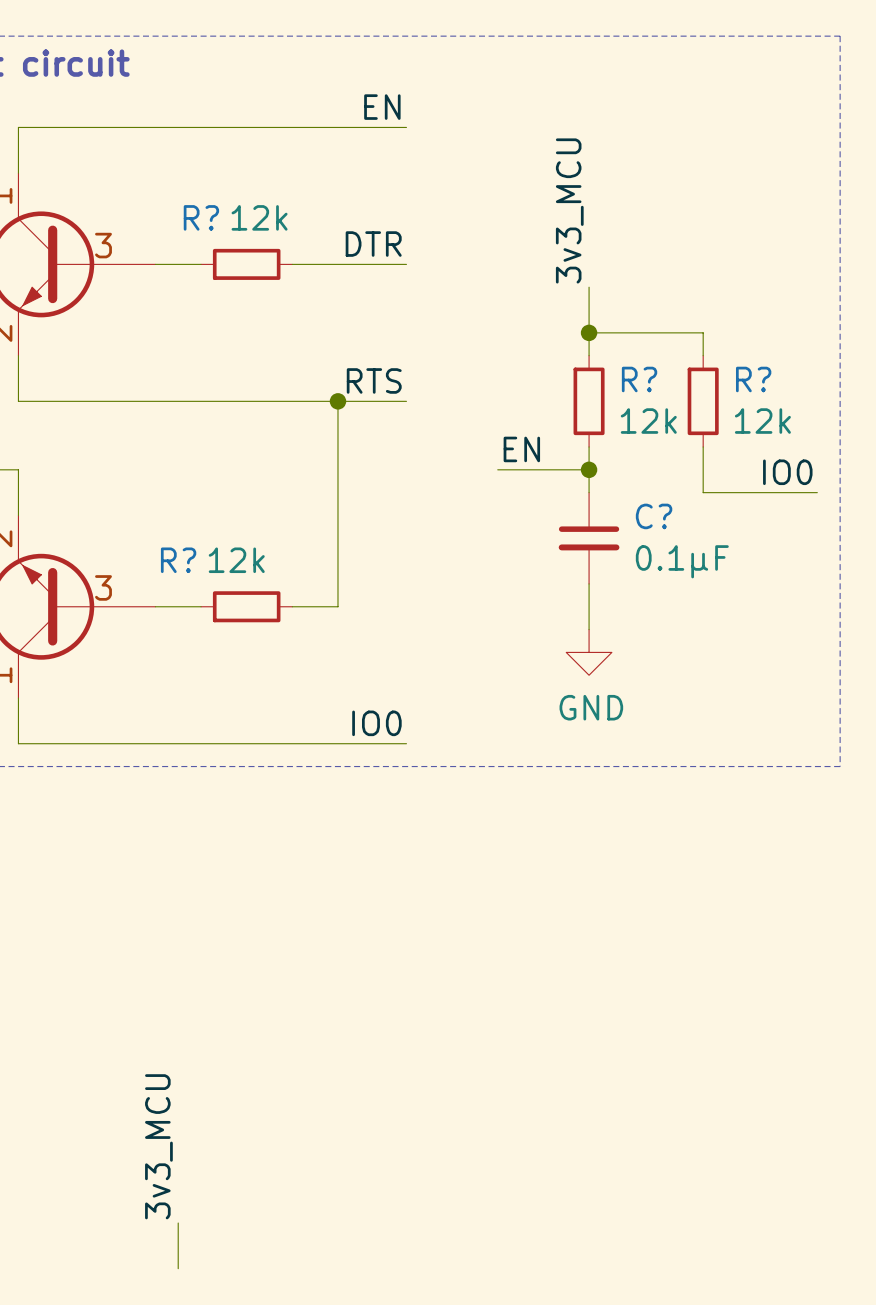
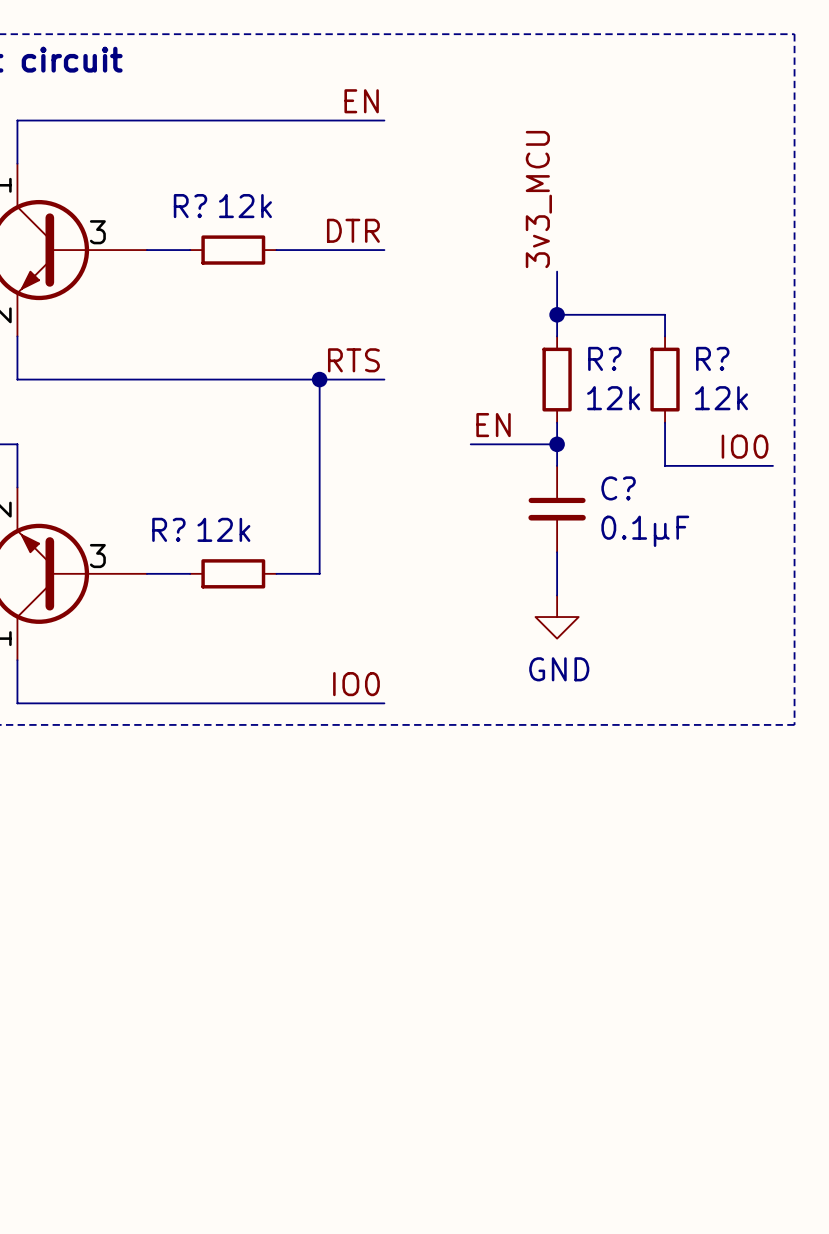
label: 3v3_MCU (158, 1146) -> none
wire: (178, 1223) (178, 1268) -> none

